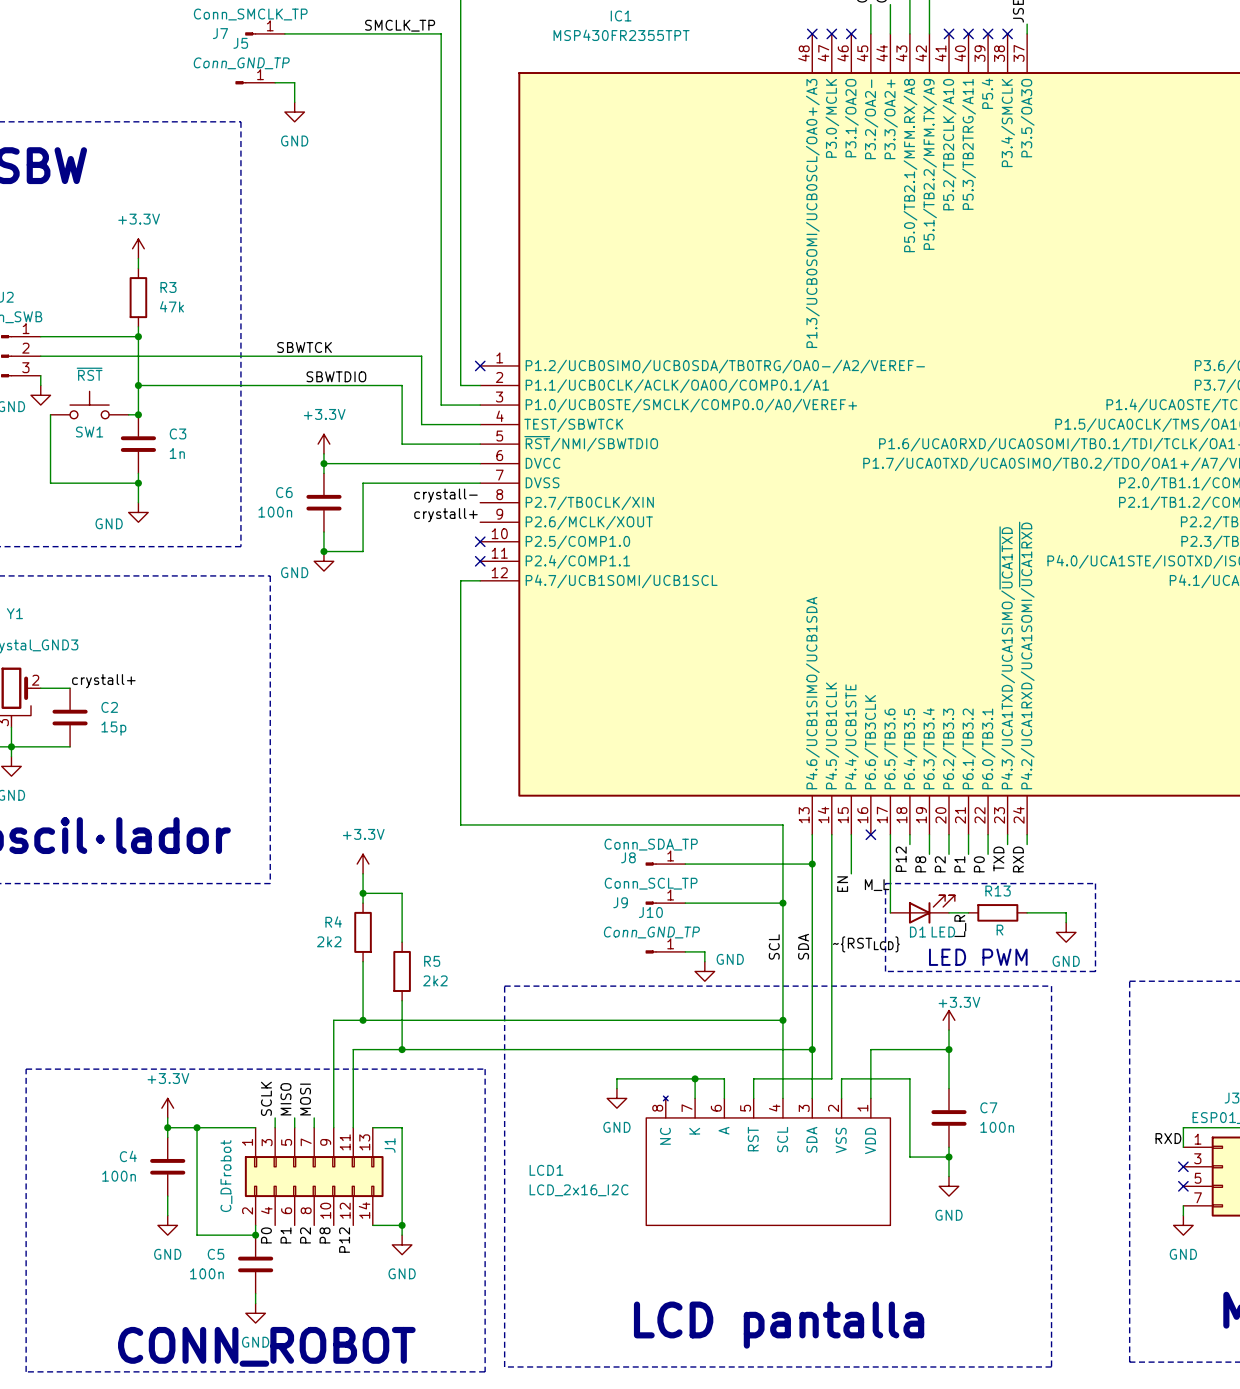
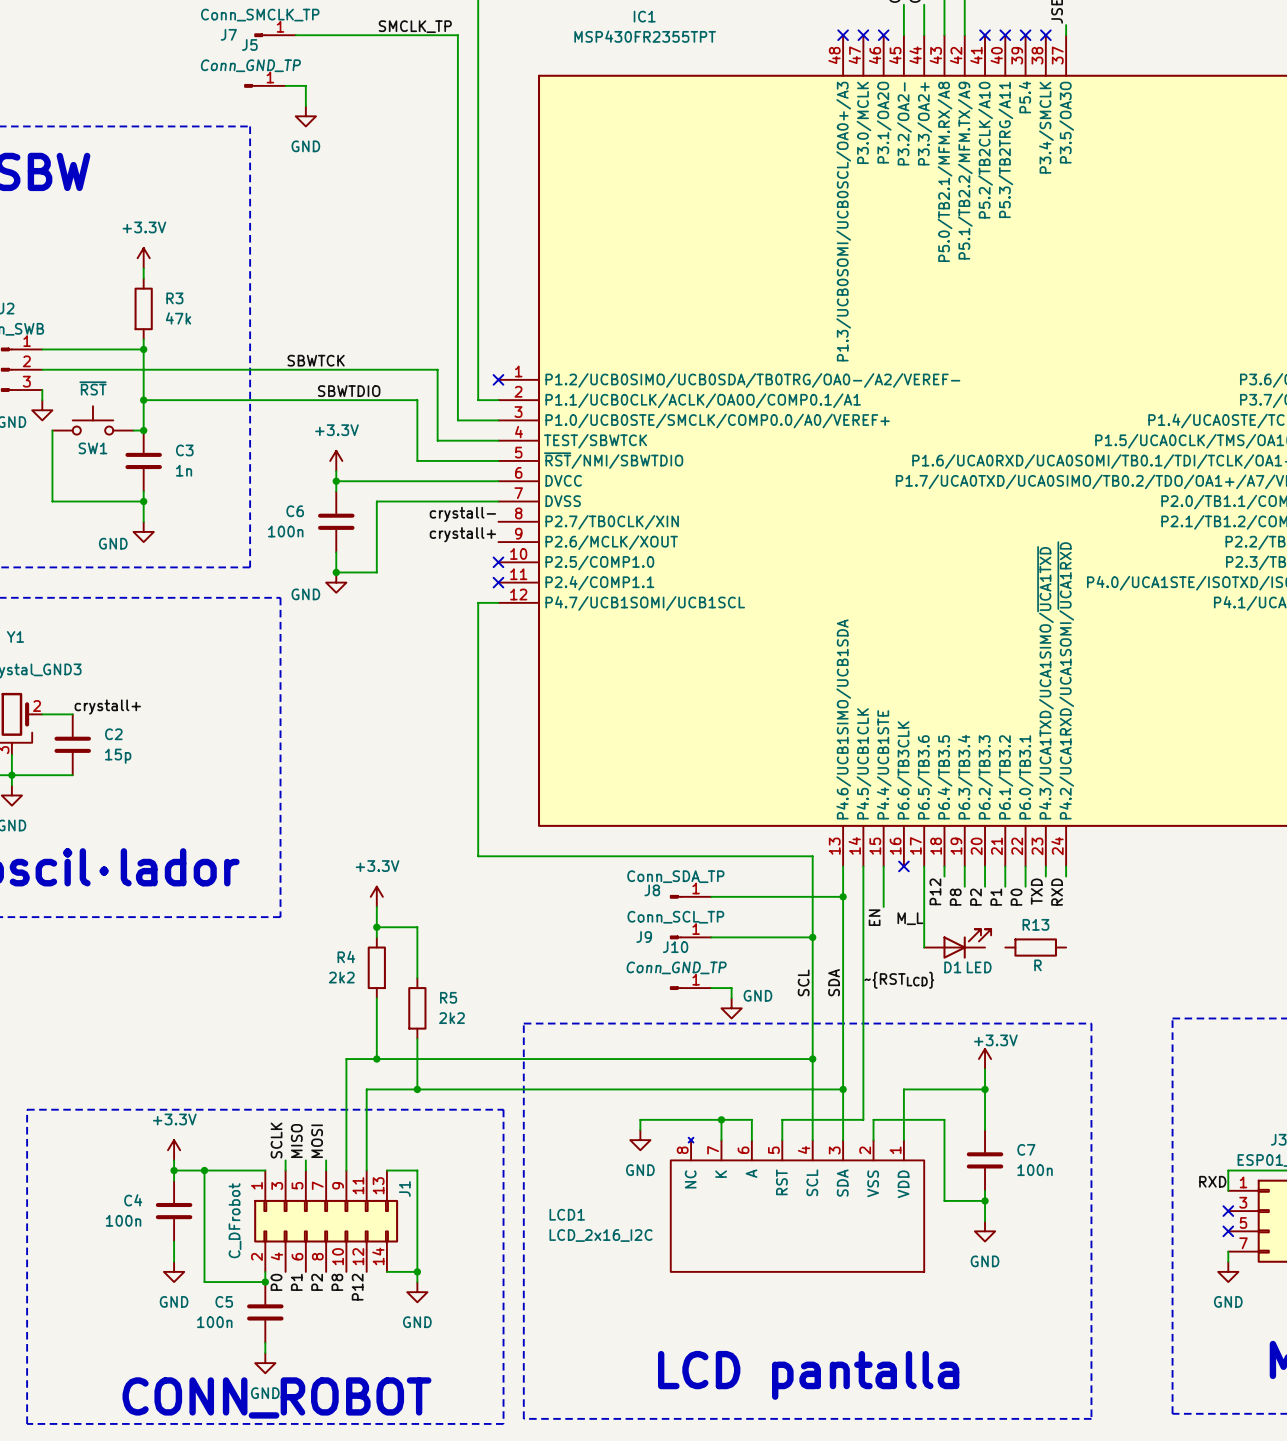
line: (885, 883) (1095, 883) (1095, 971) (885, 971) (885, 883) -> none
wire: (949, 912) (968, 912) -> none
wire: (1027, 912) (1066, 912) (1066, 922) -> none
label: L_R (960, 925) -> none
power symbol: GND (1066, 932) -> none
text: LED PWM (978, 957) -> none

